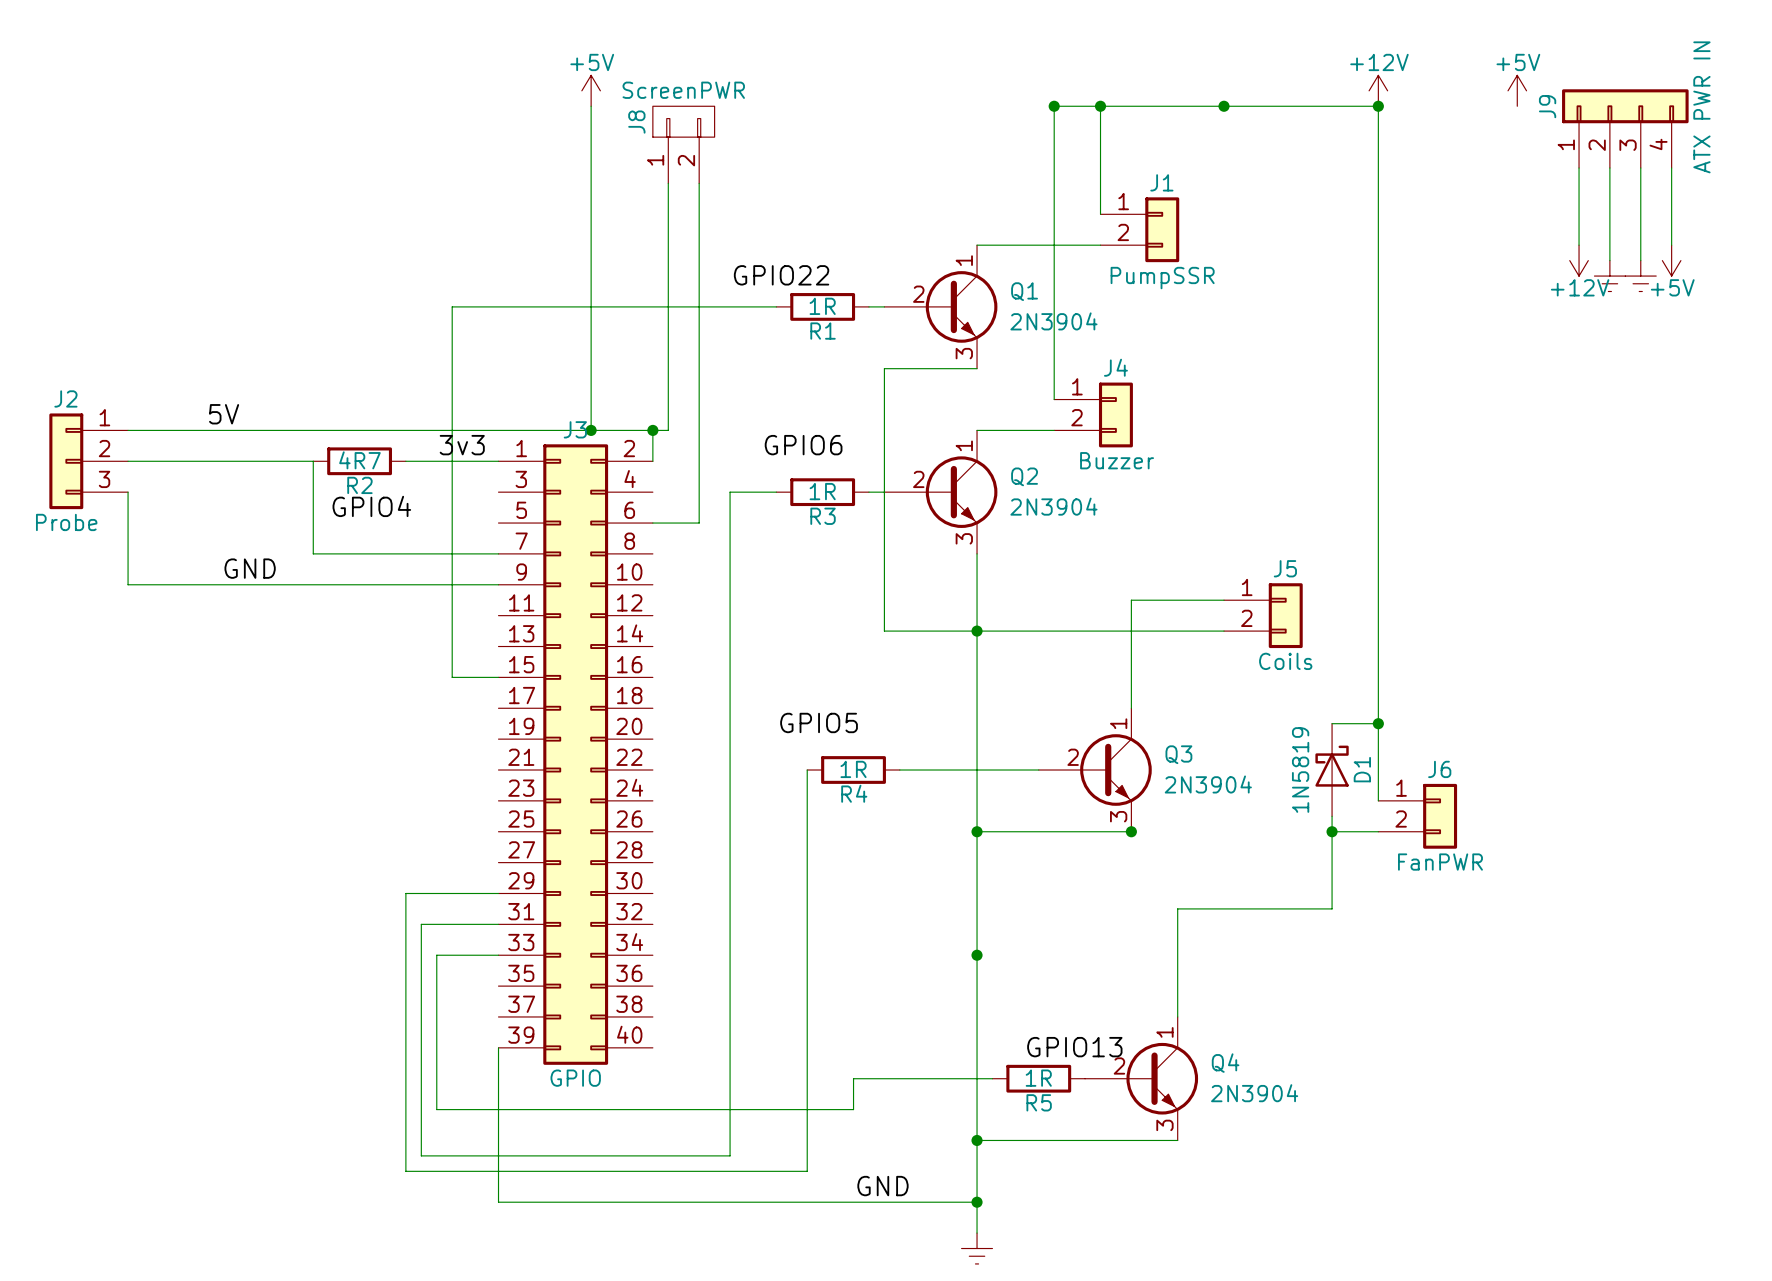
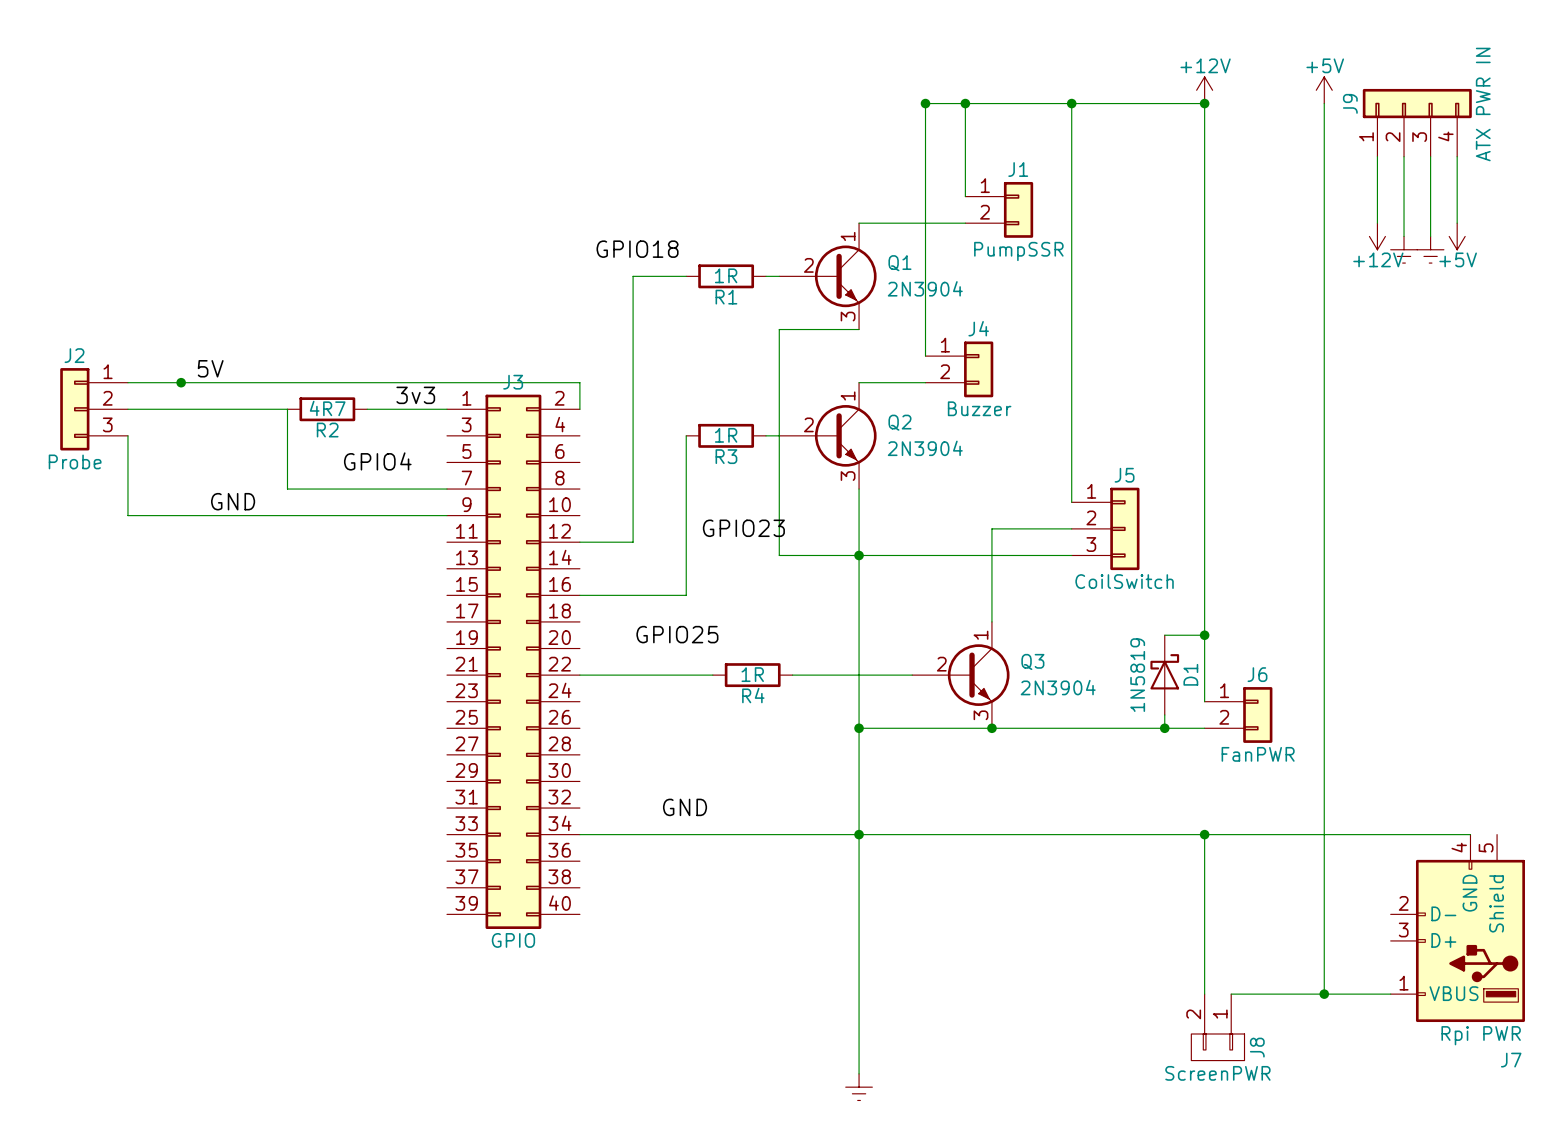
power symbol: +5V (591, 90) -> none
wire: (591, 106) (591, 430) -> none
wire: none -> (1071, 103) (1071, 502)
wire: none -> (1324, 103) (1324, 994)
J8 rotation: 0° (683, 121) -> 180° (1217, 1047)
J8 position: (683, 144) -> (1217, 1027)
wire: (668, 183) (668, 430) (652, 430) -> none
wire: (699, 183) (699, 523) (652, 523) -> none
label: GPIO22 (781, 275) -> GPIO18 (637, 249)
wire: (714, 306) (452, 306) (452, 677) (498, 677) -> (633, 276) (633, 542) (579, 542)
junction: none -> (181, 382)
junction: (591, 430) -> none
junction: (652, 430) -> none
label: GPIO6 (803, 445) -> none
wire: (776, 492) (730, 492) (730, 1155) (421, 1155) (421, 924) (498, 924) -> (686, 435) (686, 595) (579, 595)
label position: GPIO4 (371, 506) -> GPIO4 (377, 461)
J5 symbol: [1224, 583, 1303, 649] -> [1071, 487, 1140, 571]
label: none -> GPIO23 (743, 528)
J5 value: Coils (1285, 661) -> CoilSwitch (1124, 581)
label: GPIO5 (819, 722) -> GPIO25 (677, 634)
wire: (807, 770) (807, 1171) (405, 1171) (405, 893) (498, 893) -> (712, 675) (579, 675)
wire: (1332, 831) (1332, 908) (1177, 908) (1177, 1016) -> (1164, 728) (991, 728)
wire: (498, 955) (436, 955) (436, 1109) (853, 1109) (853, 1078) (992, 1078) -> none
wire: none -> (579, 834) (1470, 834)
wire: none -> (1204, 834) (1204, 994)
junction: none -> (1204, 834)
wire: (498, 1047) (498, 1202) (977, 1202) -> none
label: GPIO13 (1074, 1047) -> none
J7: none -> Rpi PWR (1457, 928)
R5: 1R (1038, 1078) -> none
Q4: 2N3904 (1141, 1078) -> none
wire: (977, 1140) (1177, 1140) -> none
junction: (977, 1140) -> none
wire: none -> (1231, 994) (1390, 994)
junction: none -> (1324, 994)
label position: GND (882, 1186) -> GND (685, 807)
junction: (977, 1202) -> none

